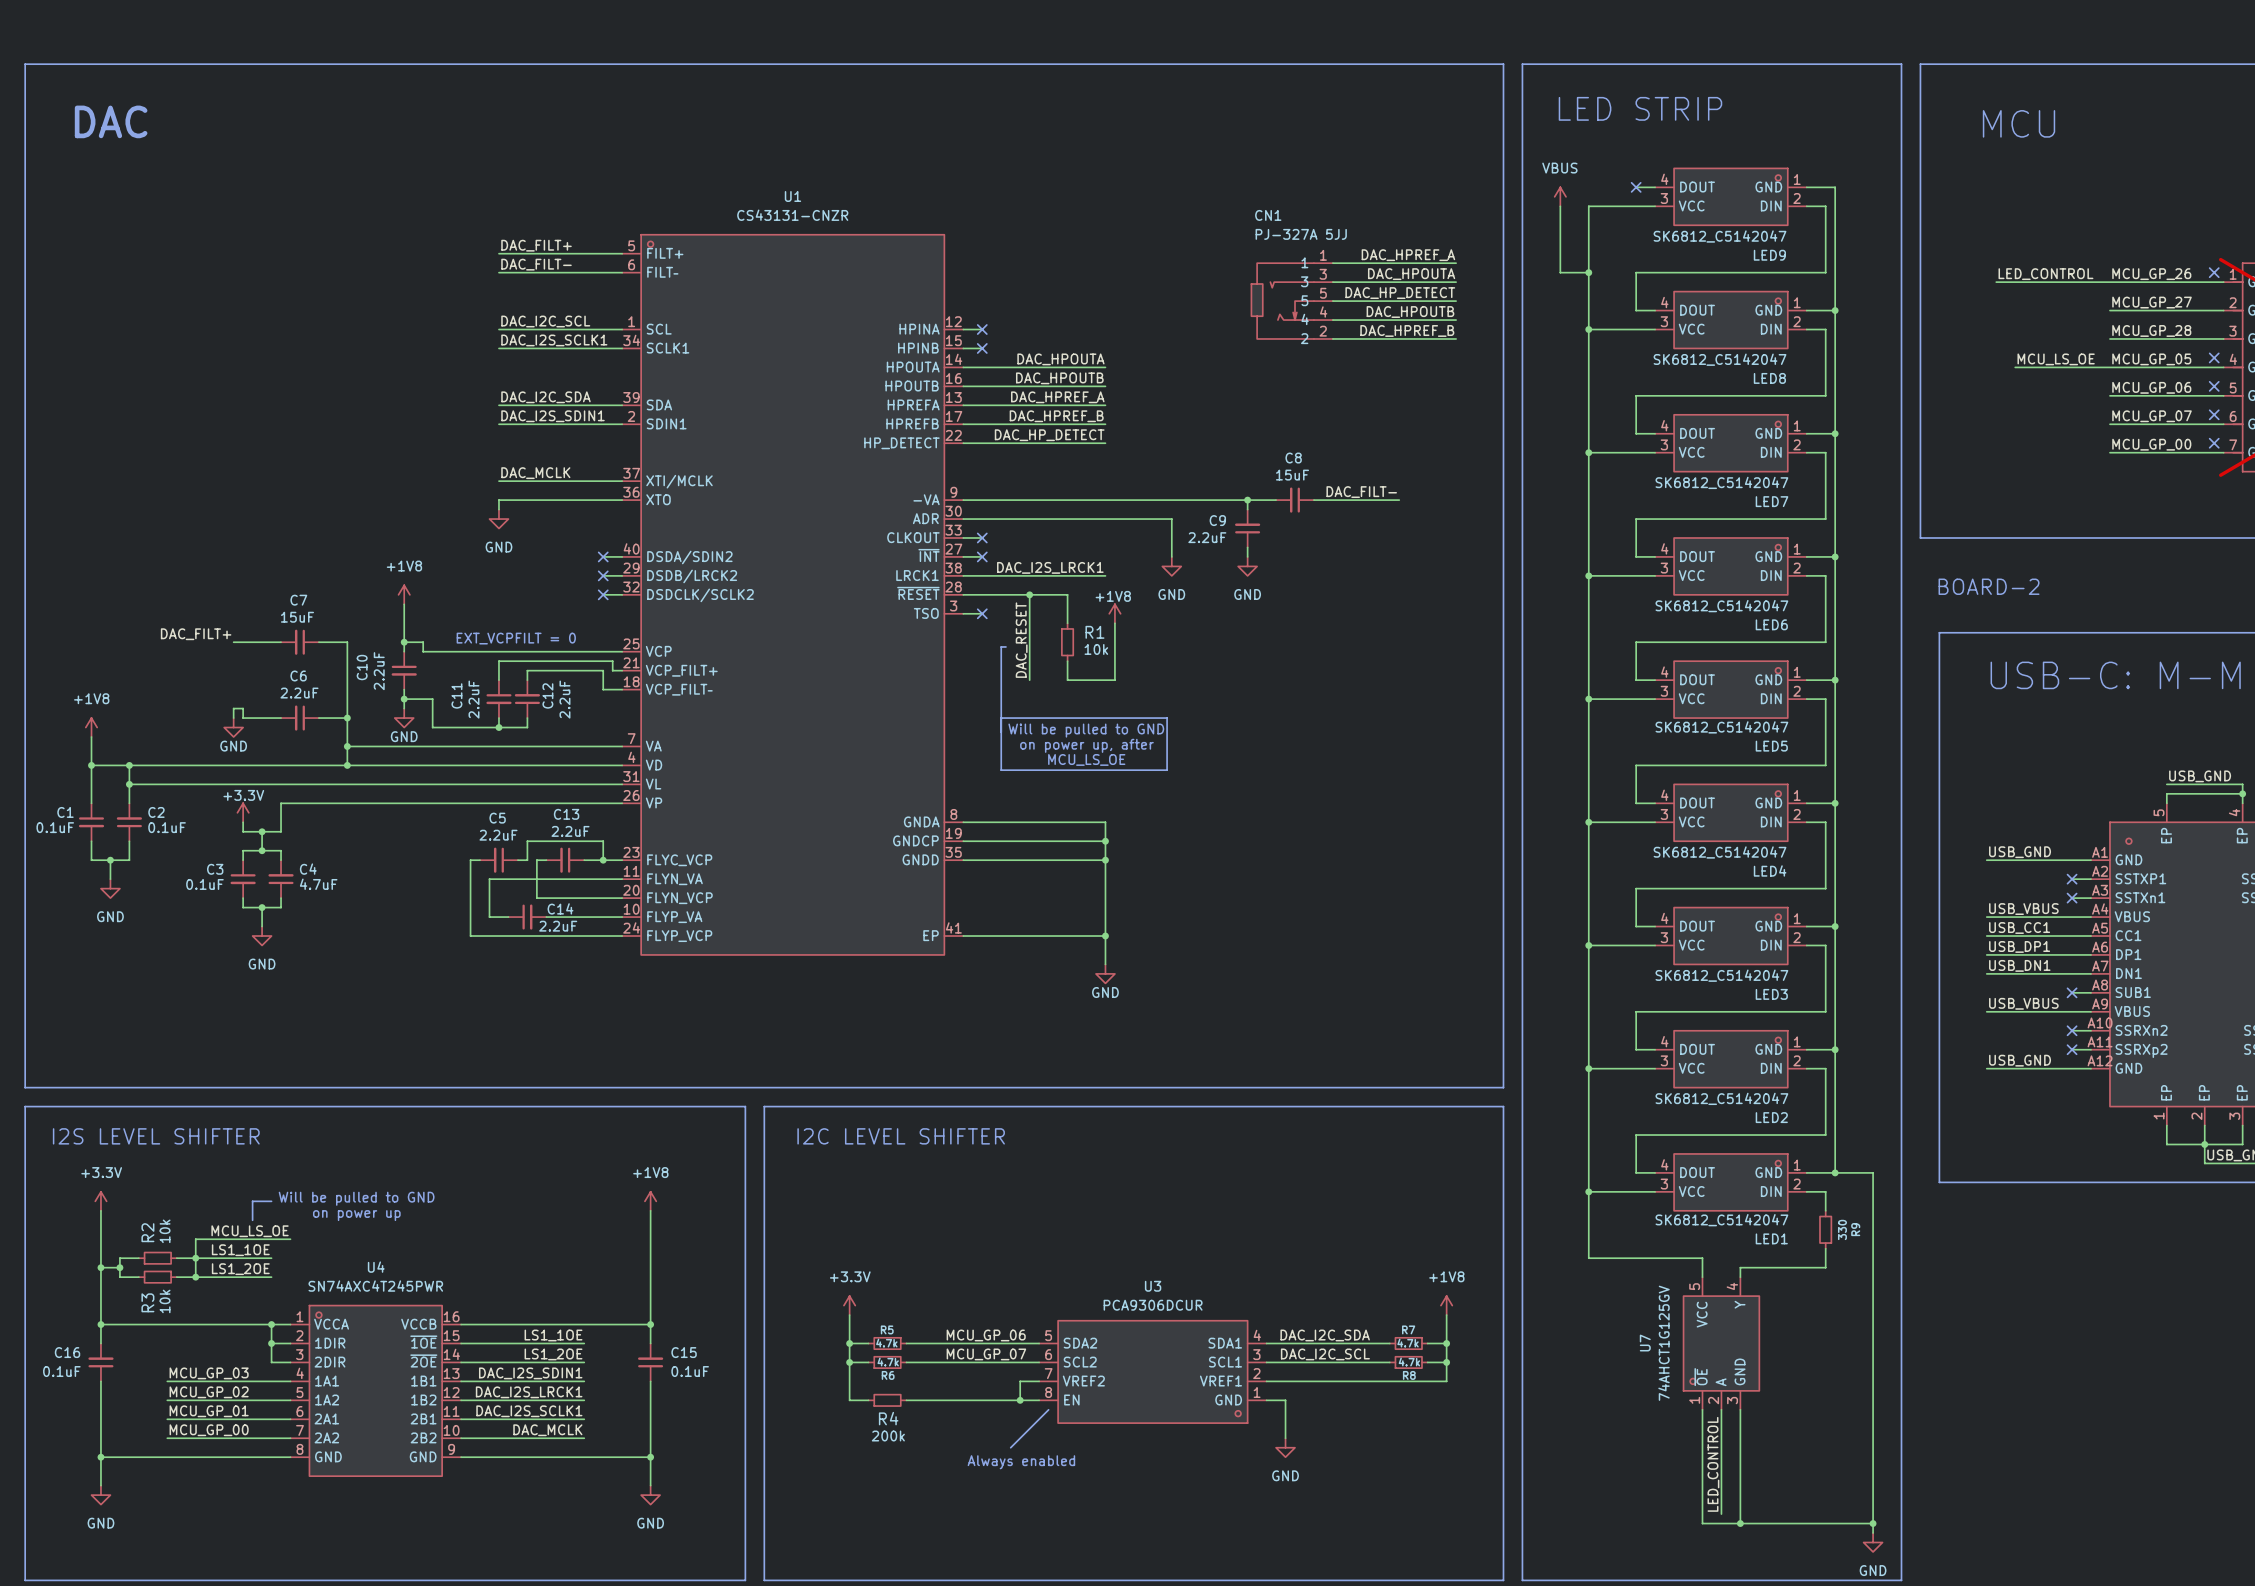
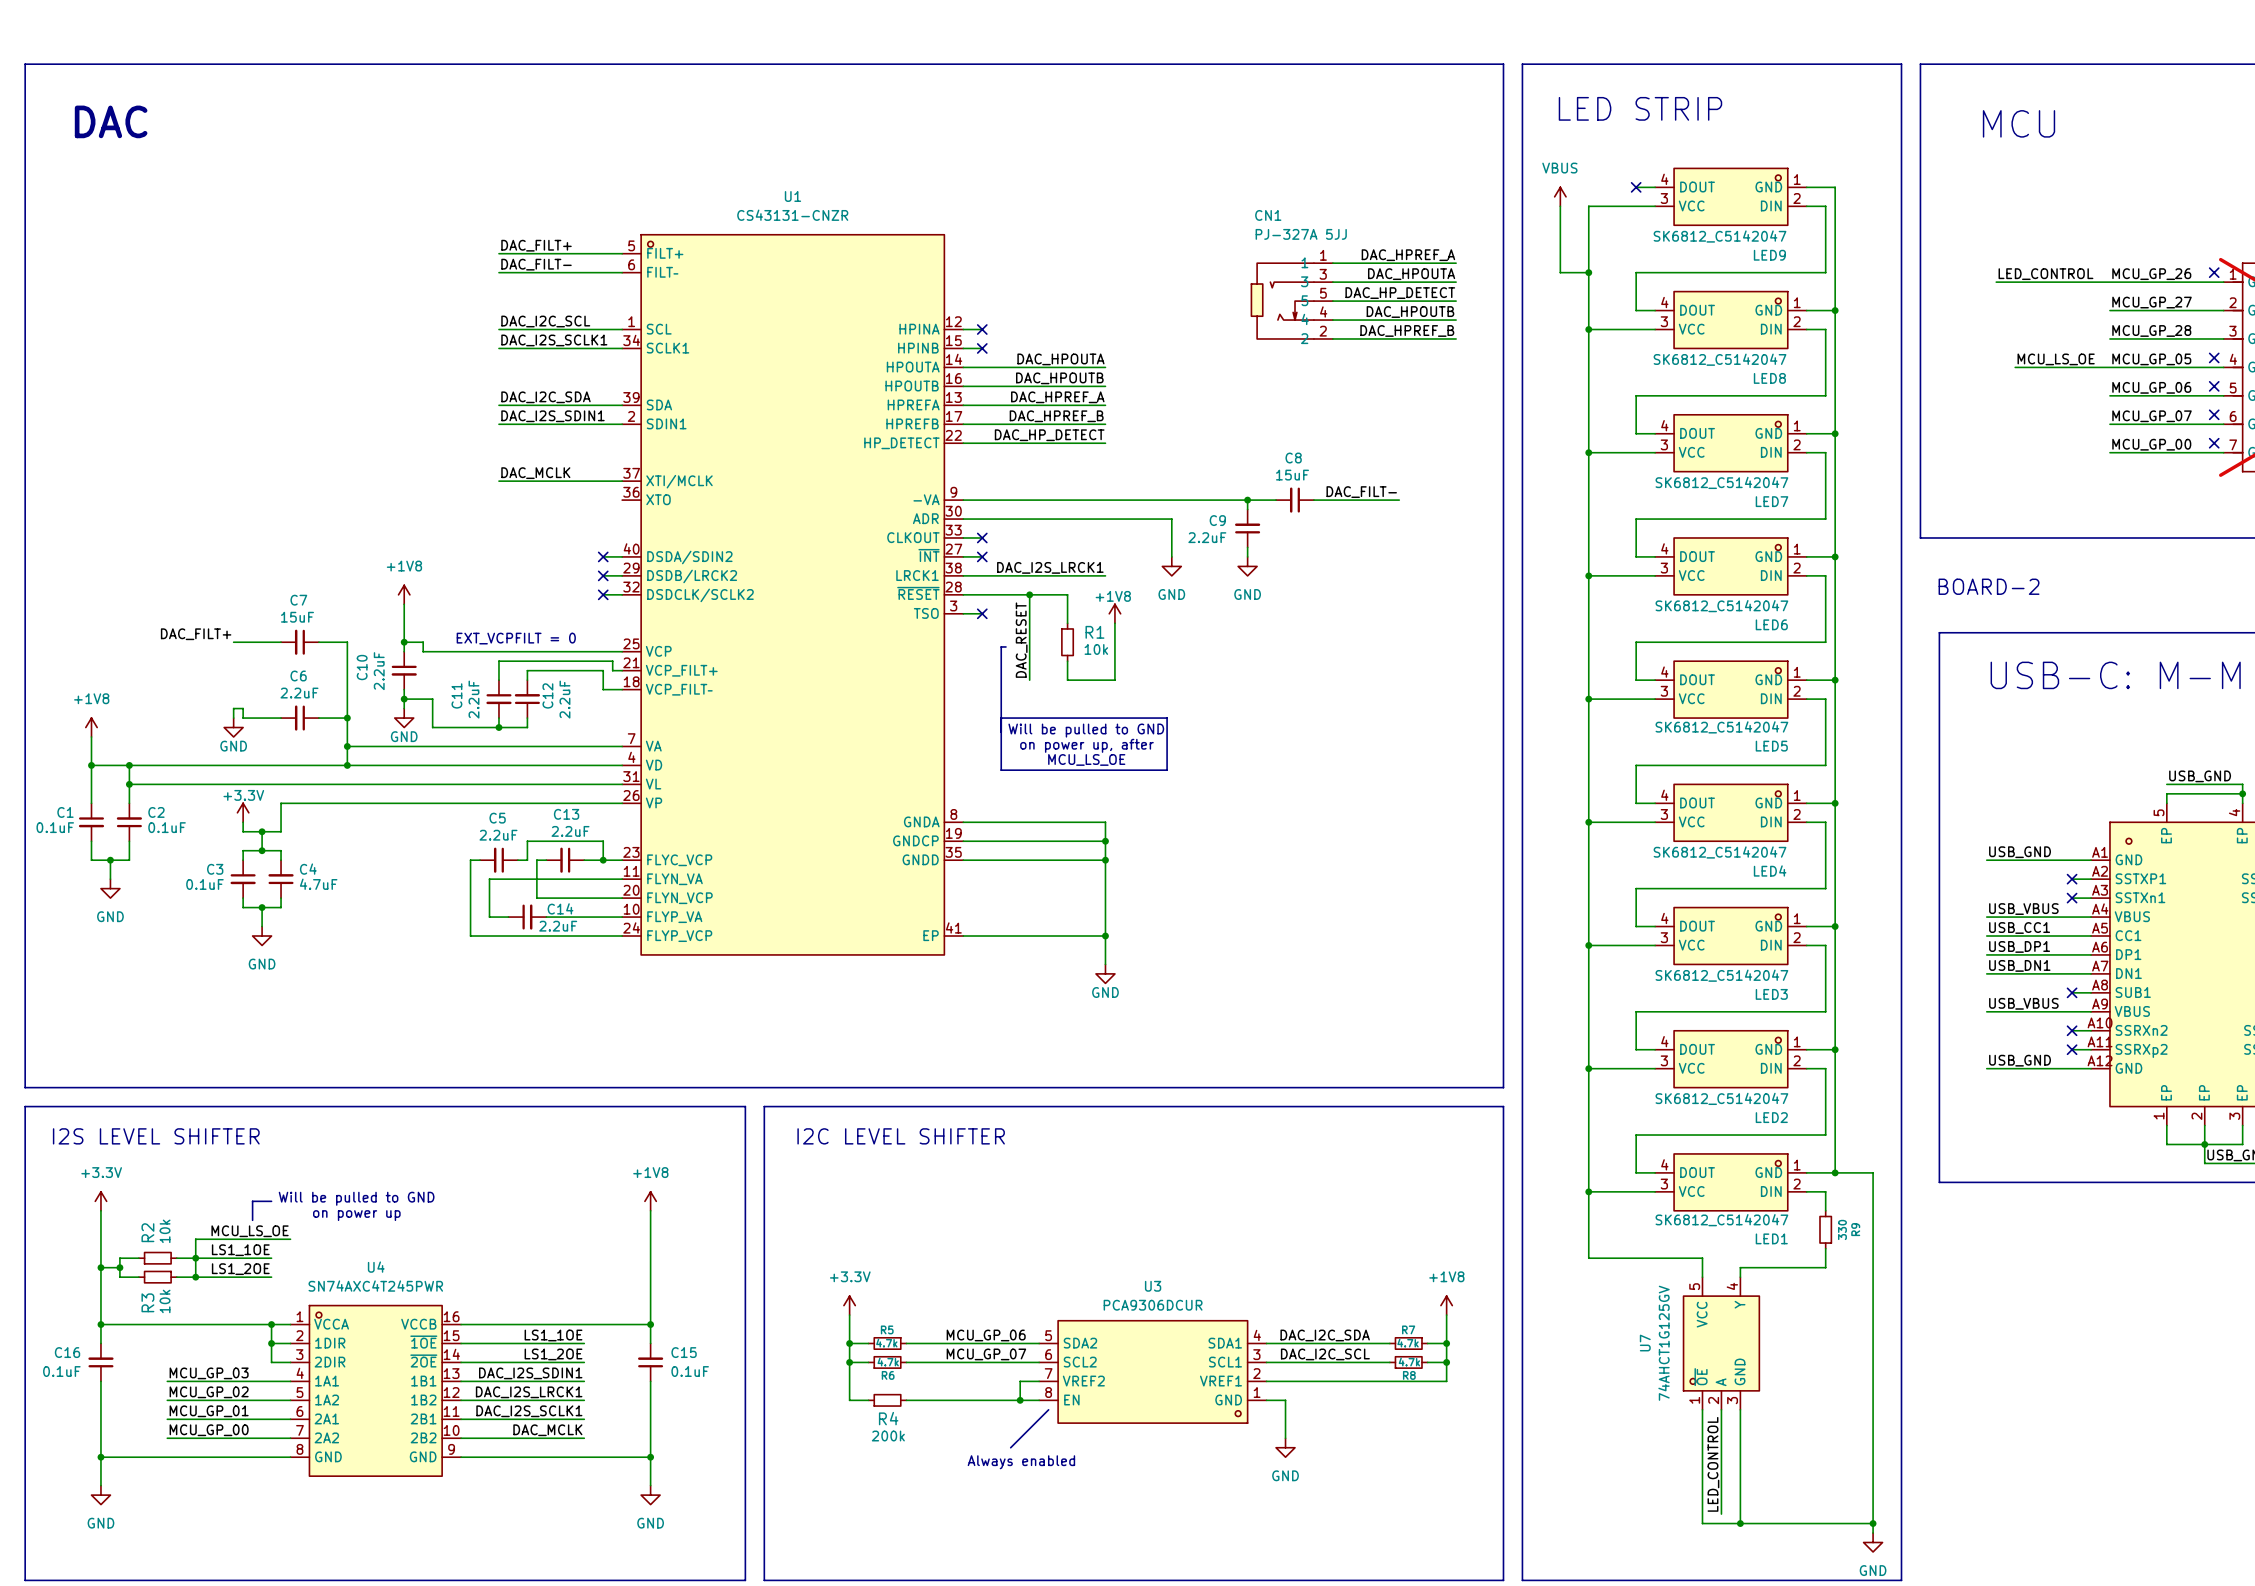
wire: (622, 500) (498, 500) (498, 509) -> none
power symbol: GND (498, 519) -> none

